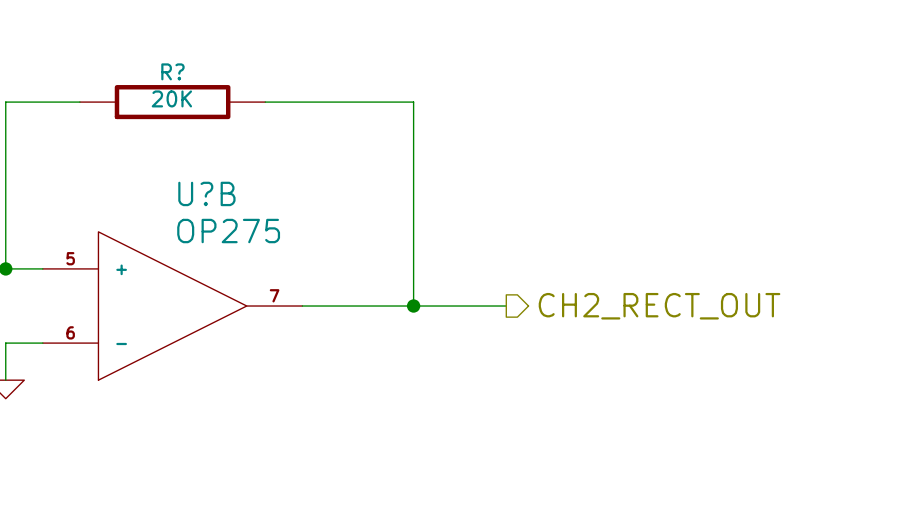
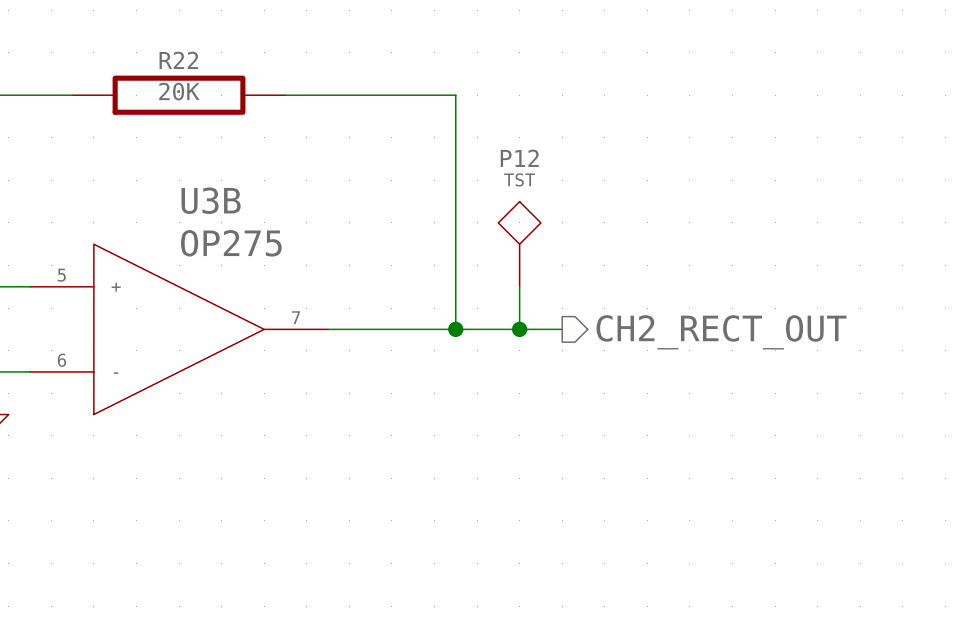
R? name: R? (172, 71) -> R22 (178, 60)
U?B name: U?B (206, 193) -> U3B (211, 200)
P12: none -> TST (519, 244)
wire: none -> (519, 286) (519, 329)
junction: none -> (519, 329)

